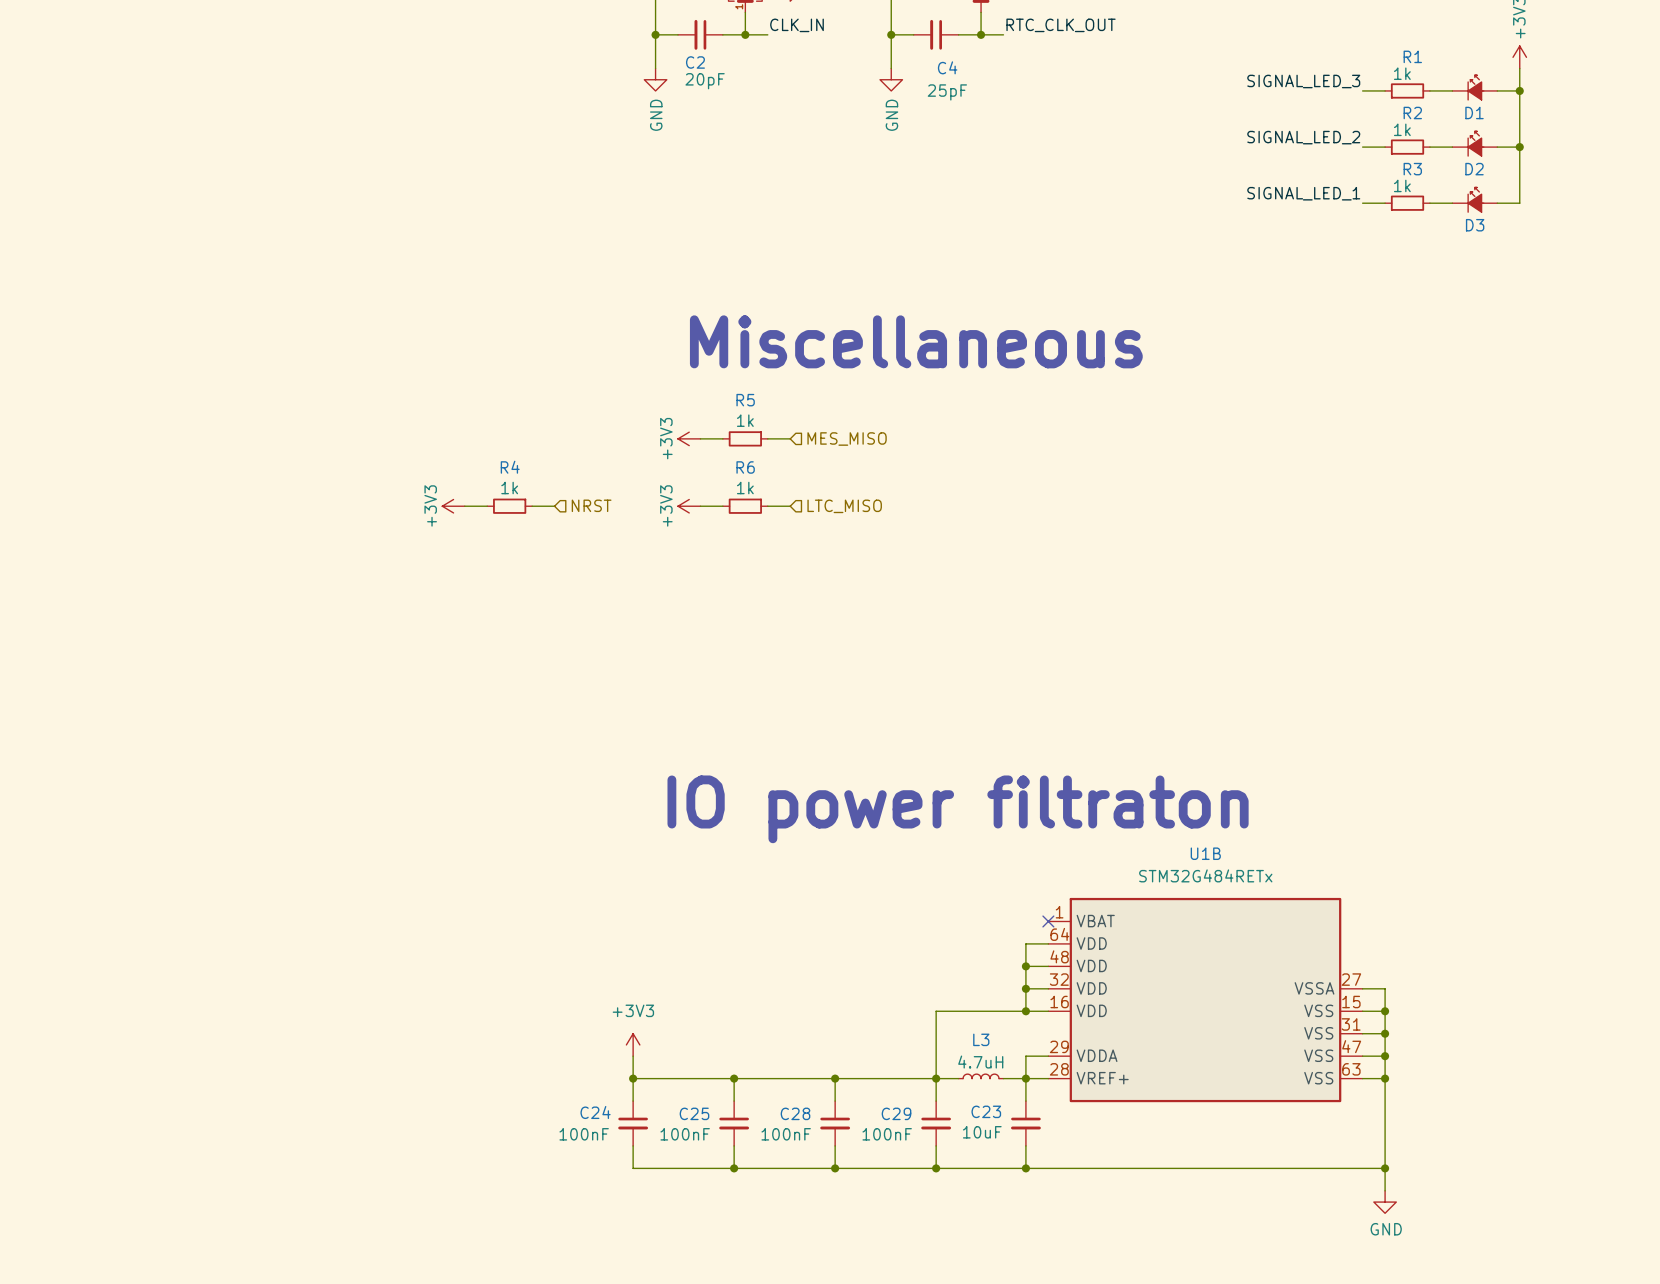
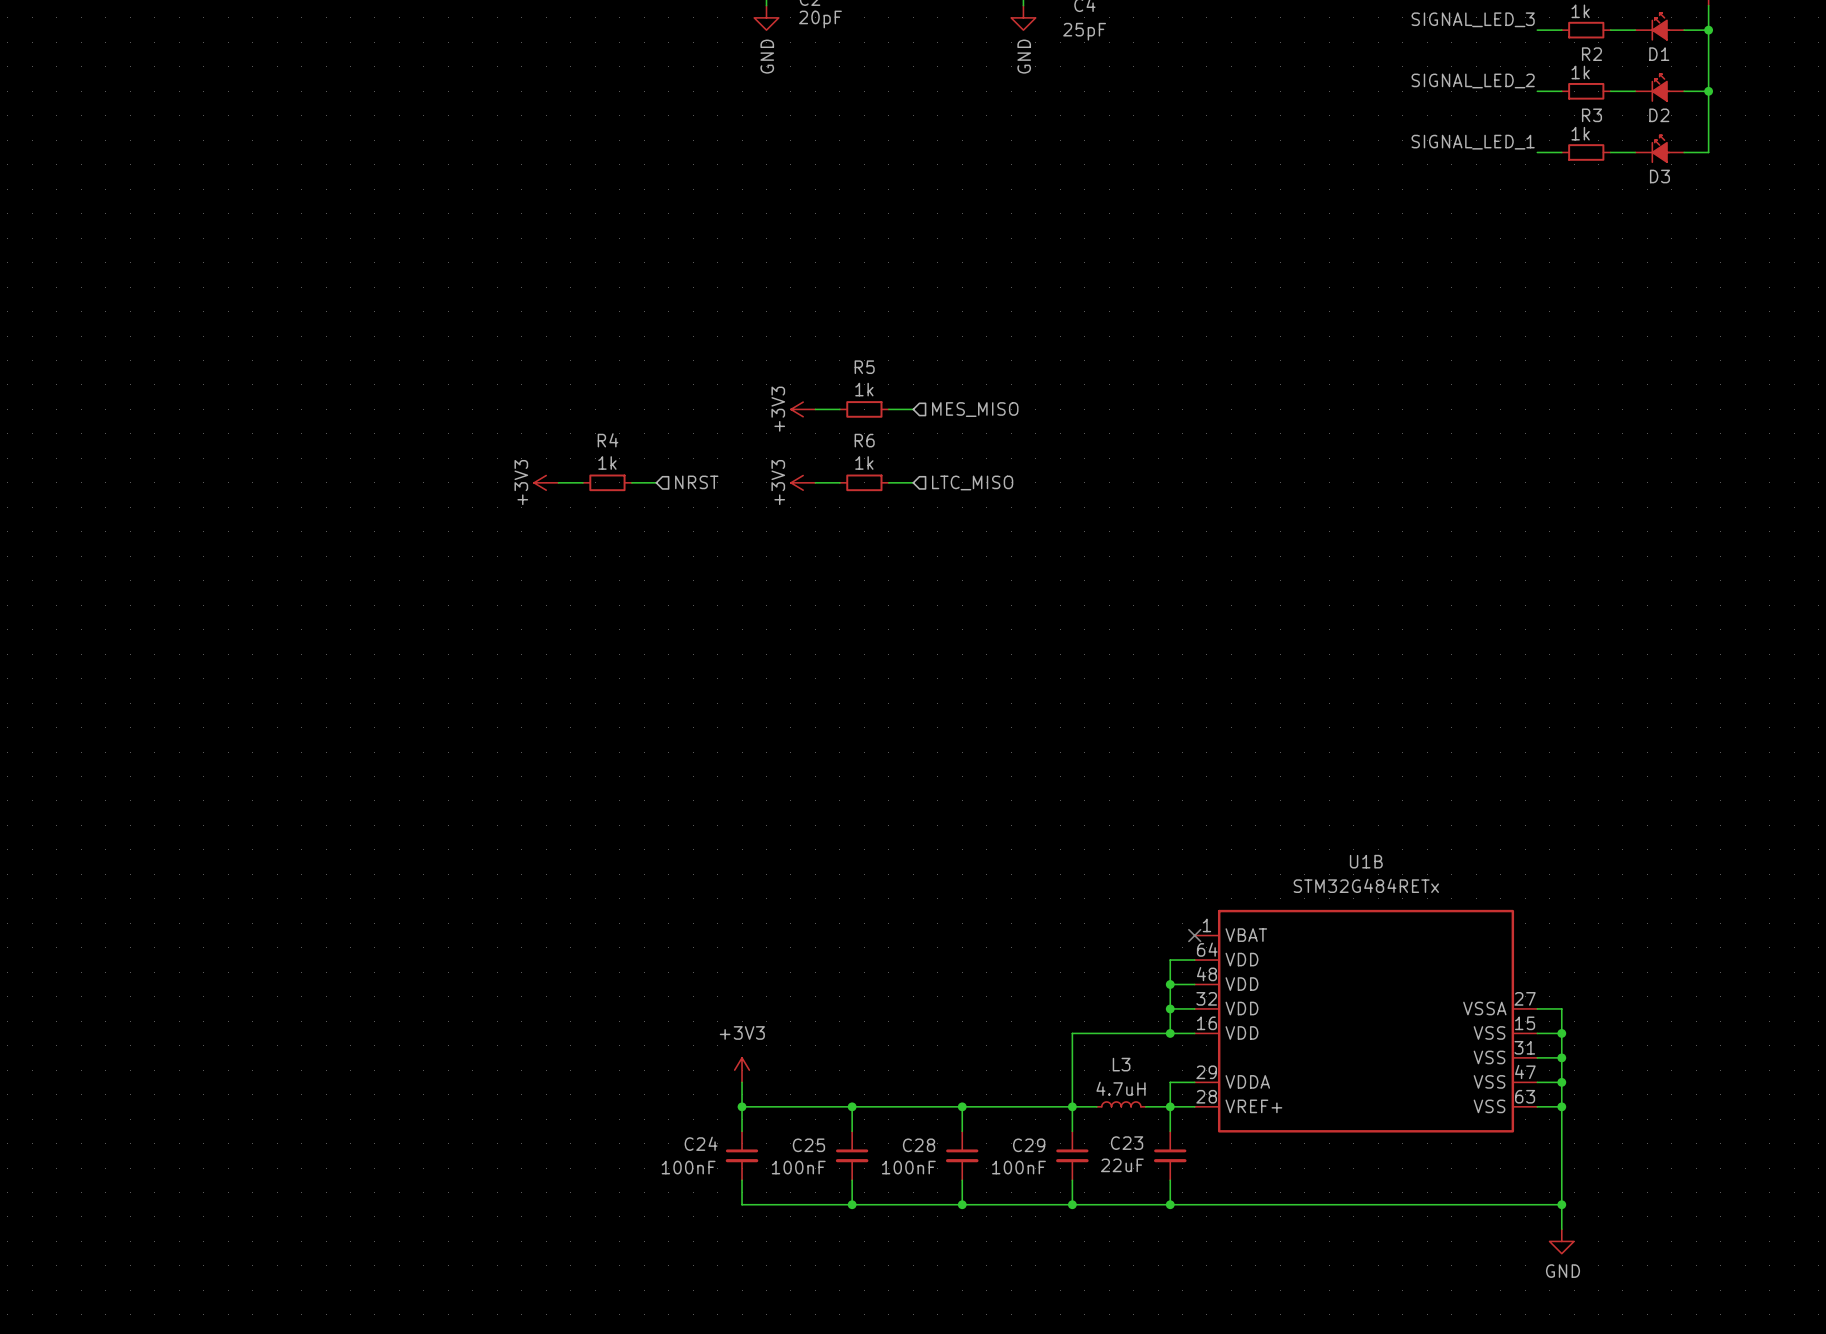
text: Miscellaneous (916, 341) -> none
text: IO power filtraton (958, 809) -> none
C23 value: 10uF (982, 1132) -> 22uF (1122, 1165)

